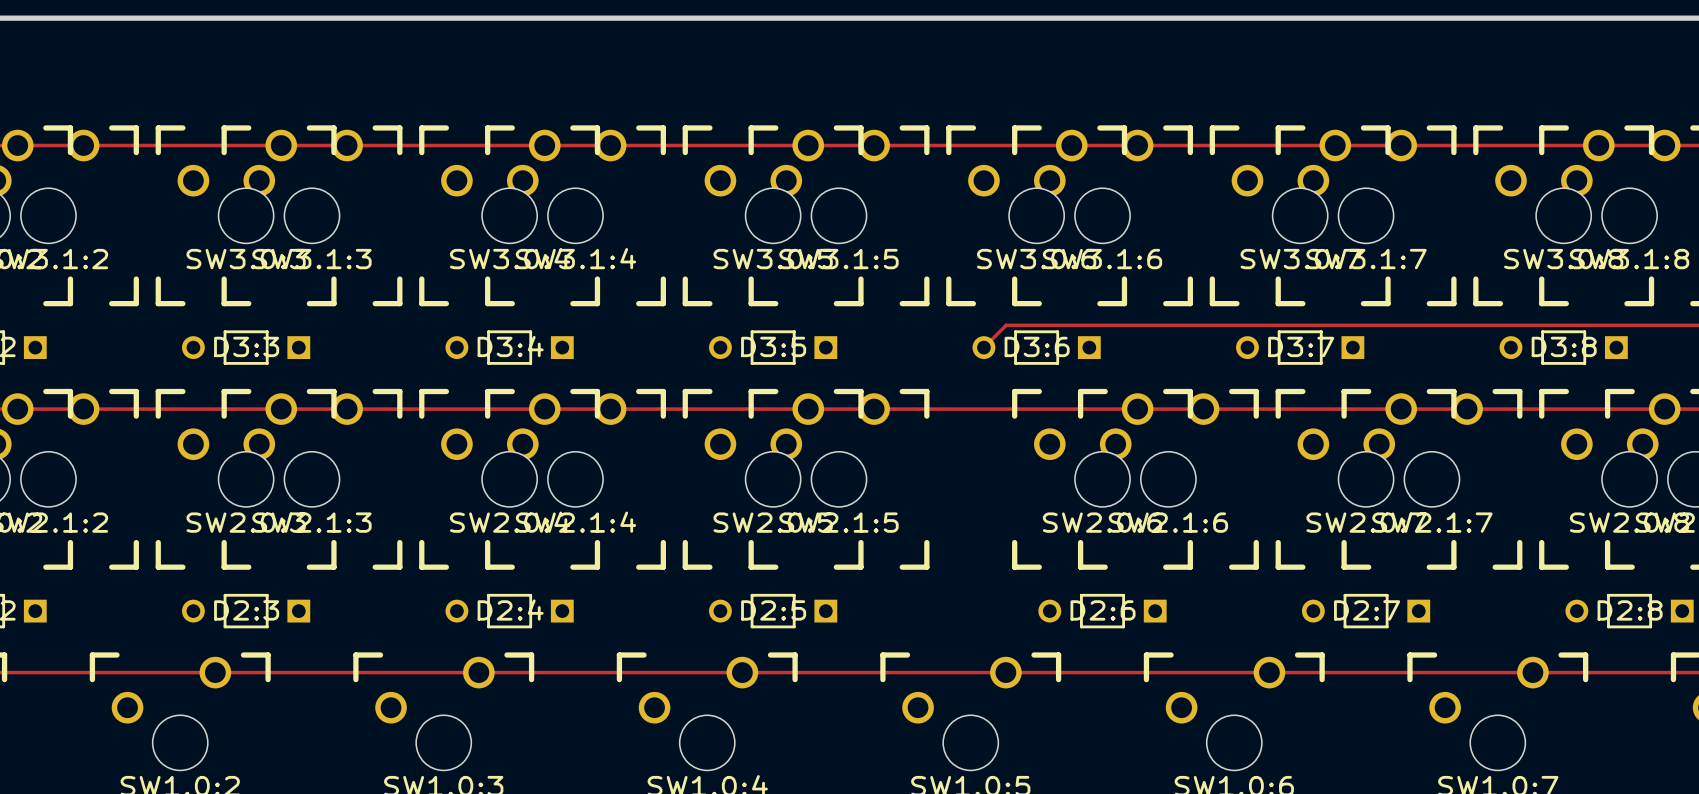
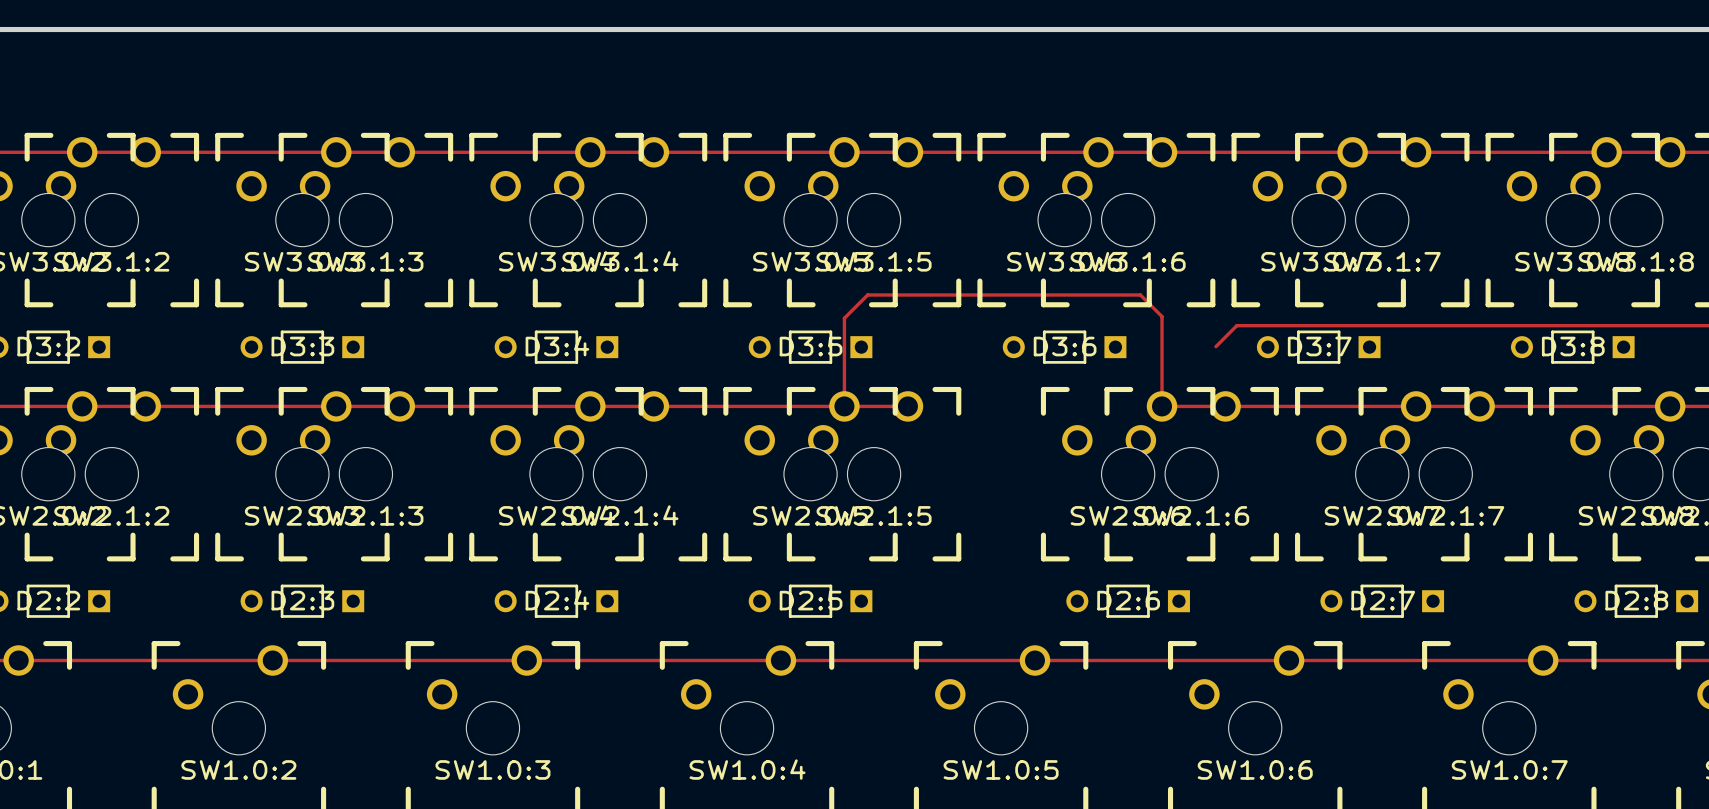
track: (1215, 325) (1006, 325) (983, 347) -> (1236, 325) (1215, 346)
track: (874, 409) (1137, 409) -> (844, 406) (844, 318) (867, 295) (1140, 295) (1162, 316) (1162, 406)

